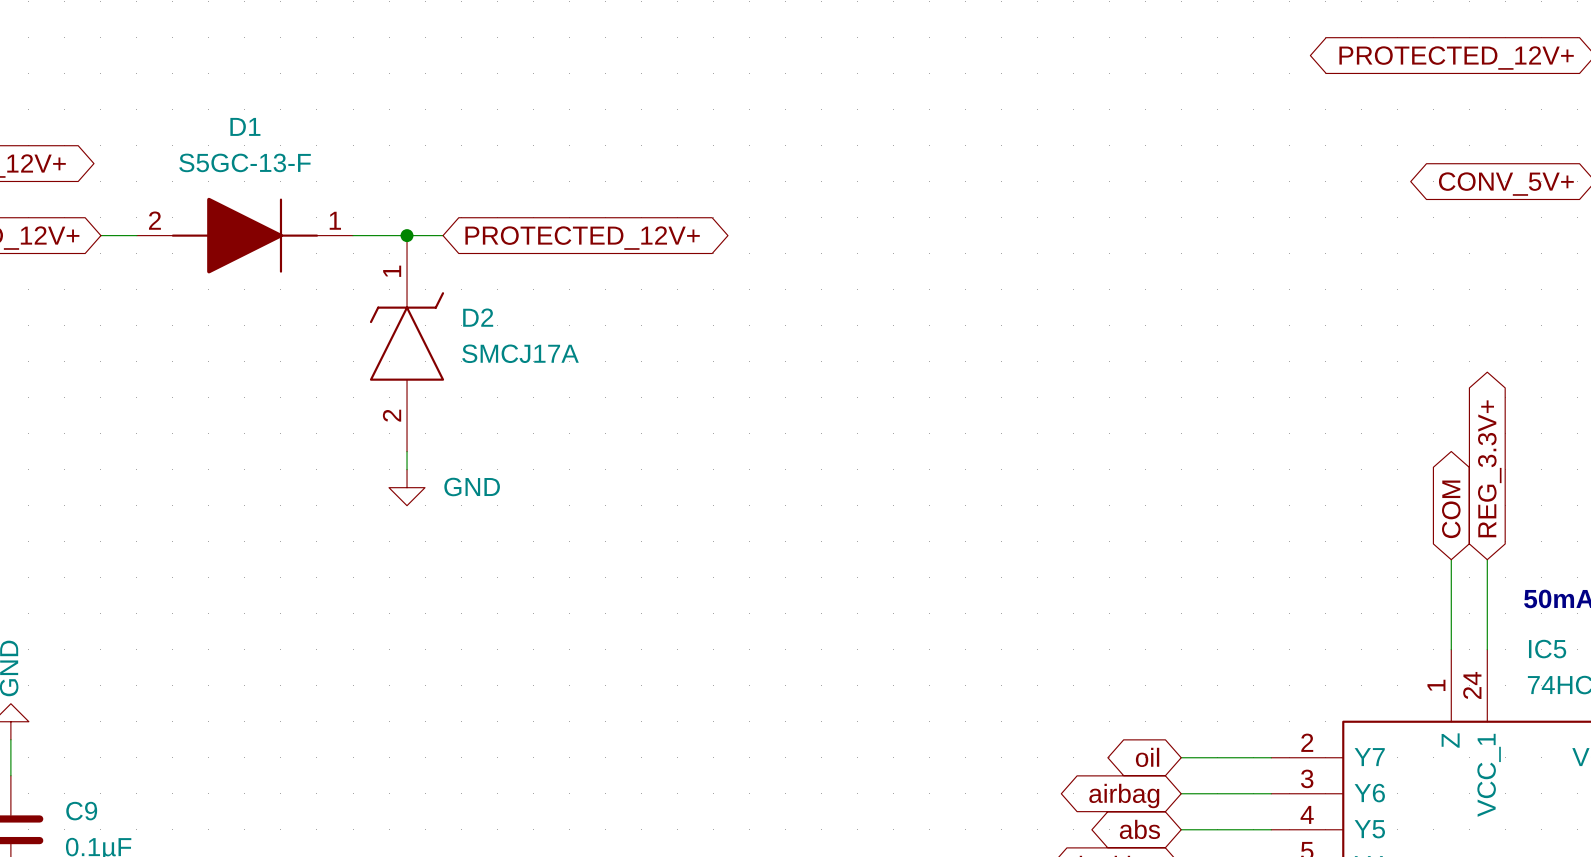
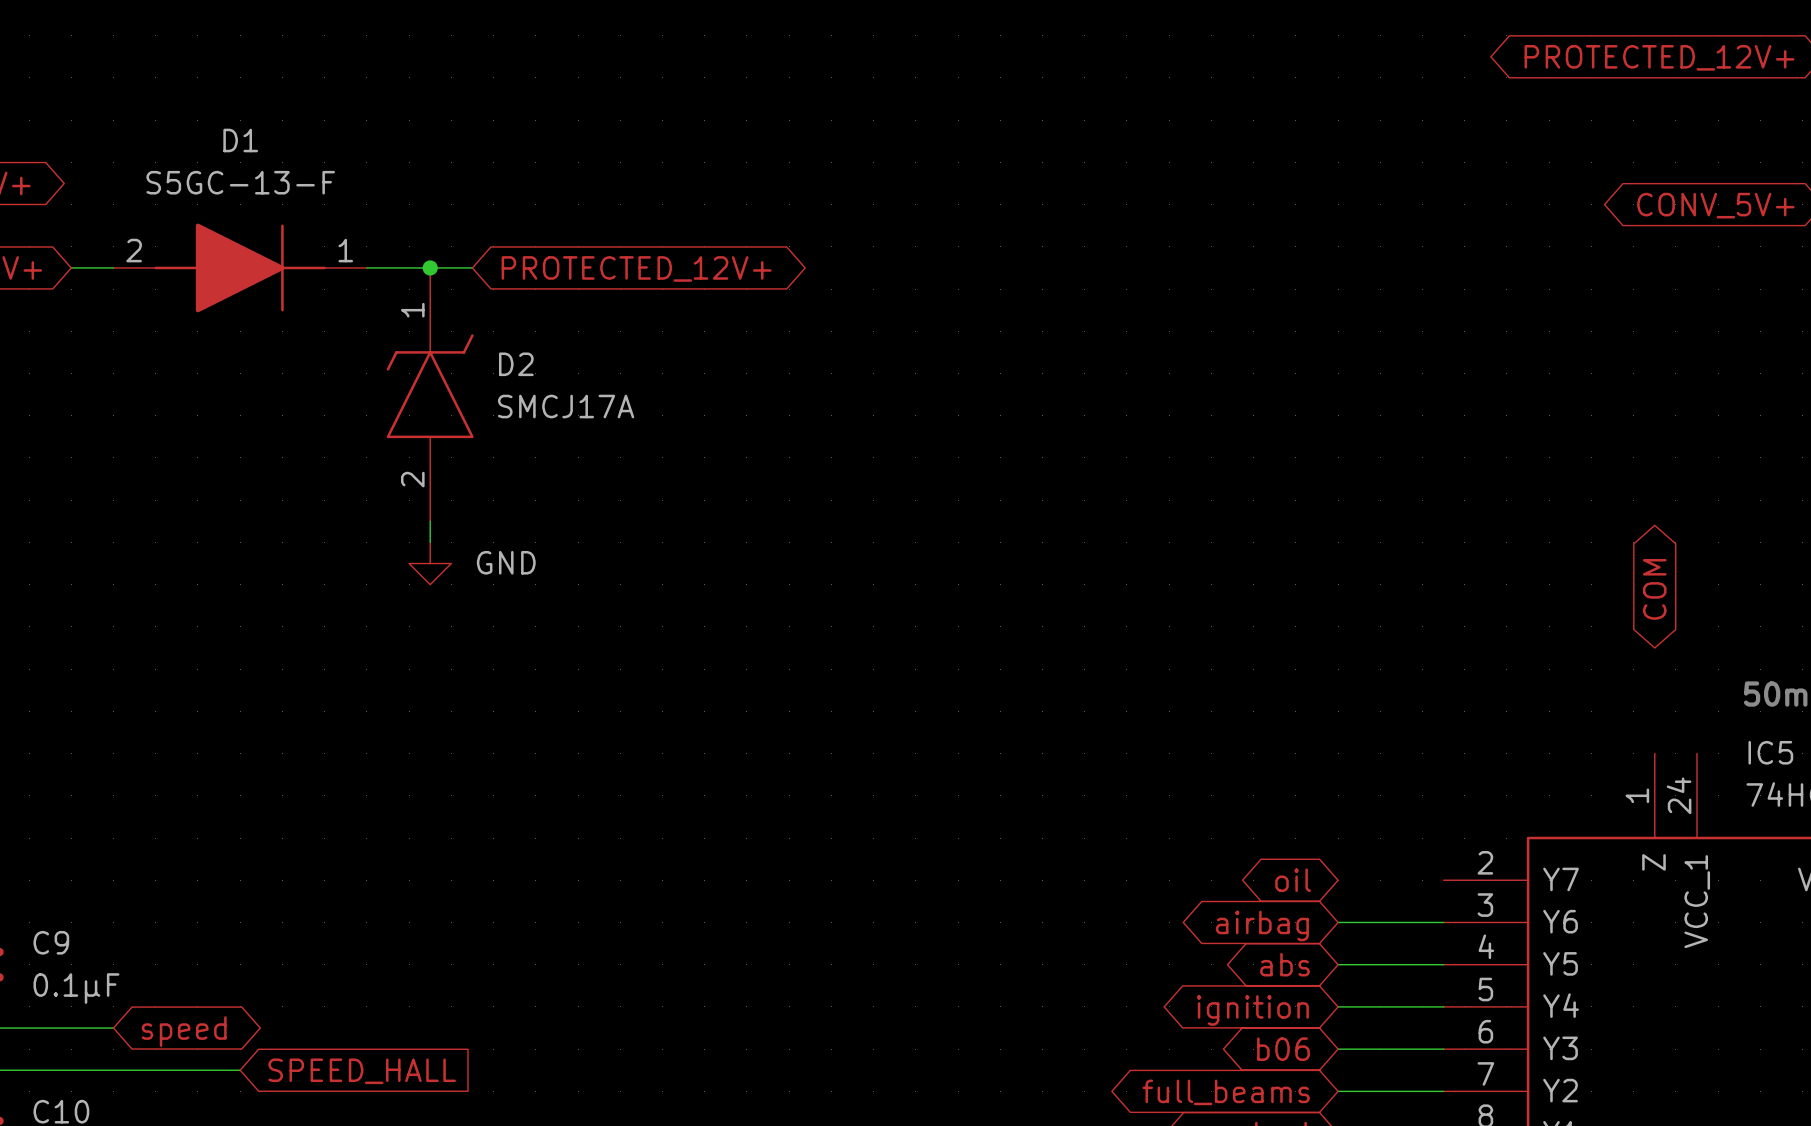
global label: REG_3.3V+ (1489, 468) -> none
wire: (1451, 559) (1451, 649) -> none
wire: (1487, 559) (1487, 649) -> none
wire: (1181, 757) (1271, 757) -> none

